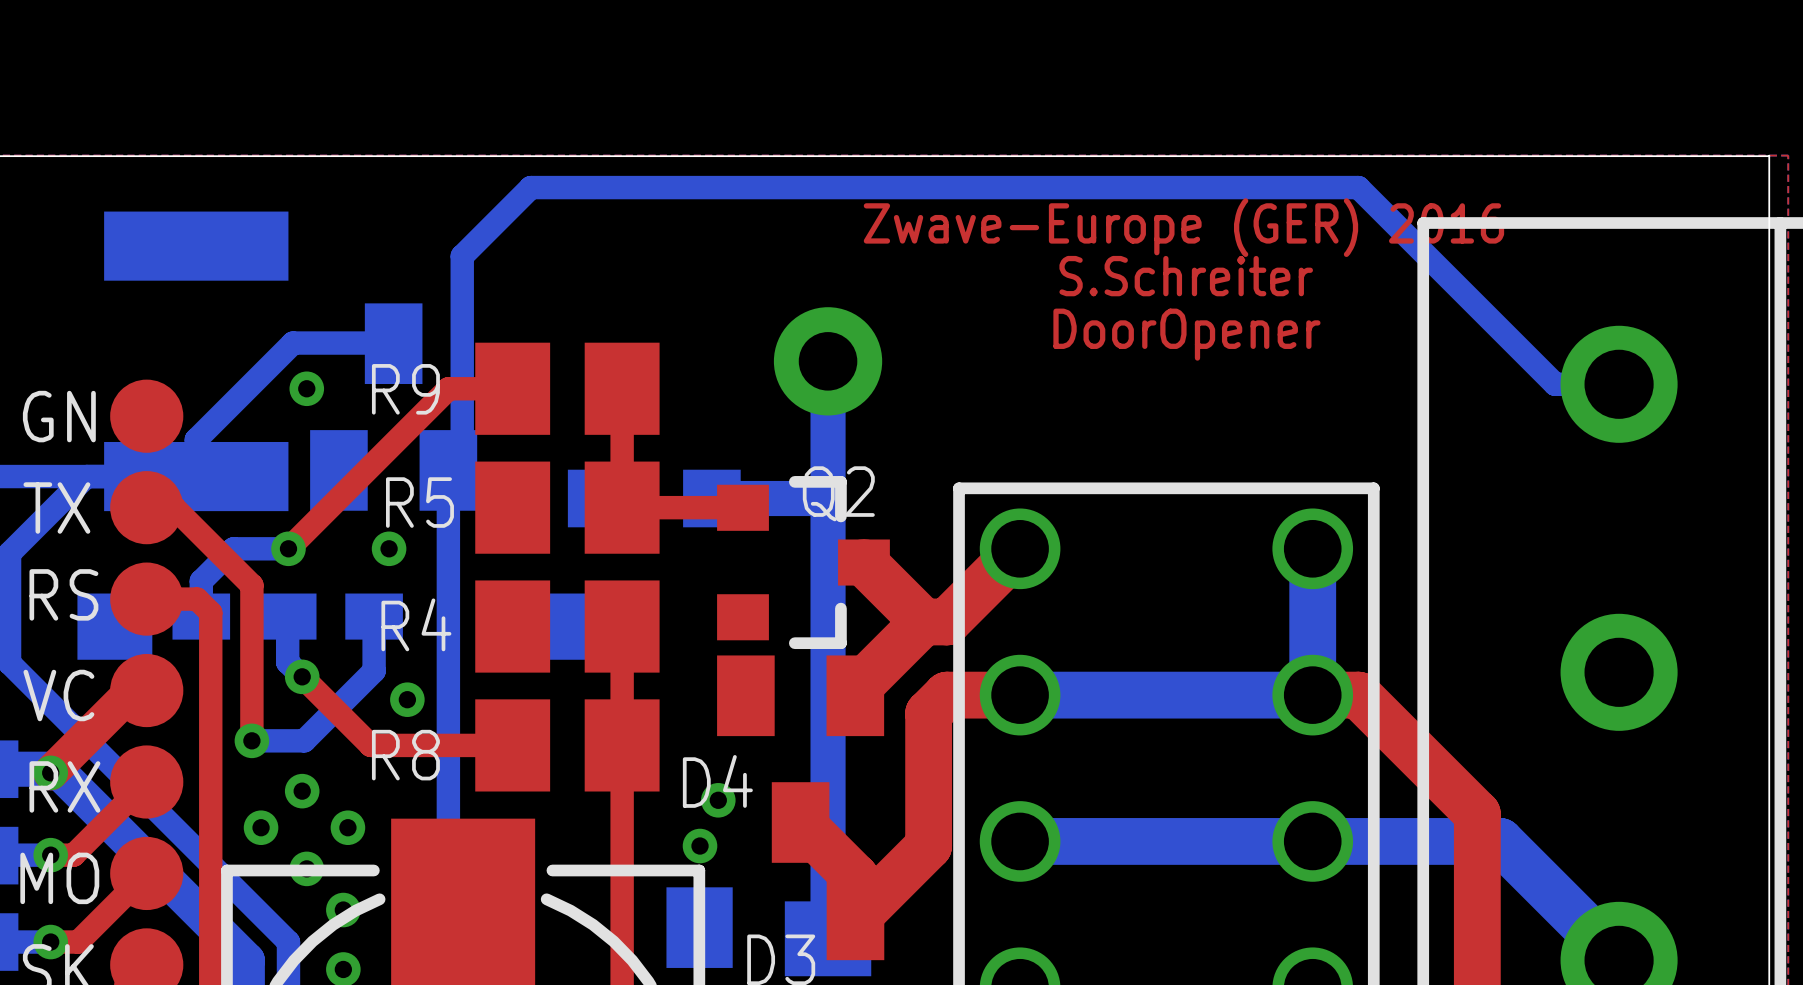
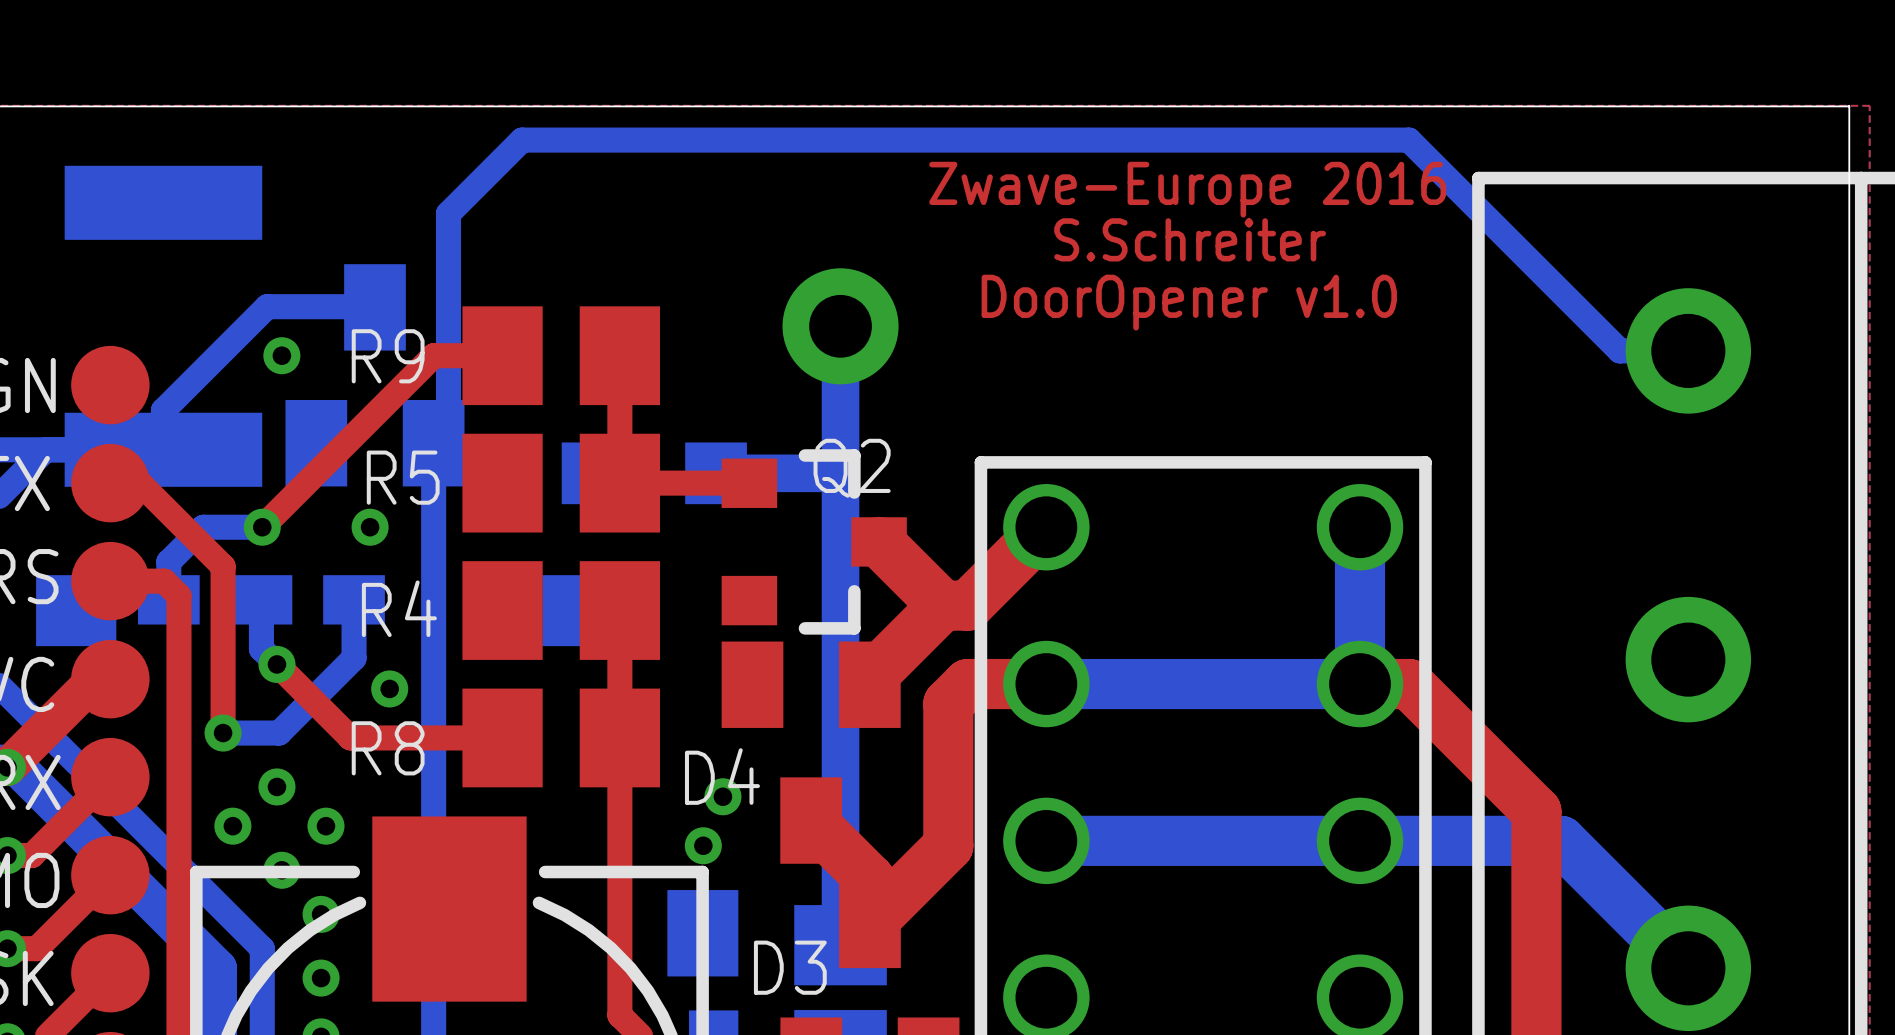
text: Zwave-Europe (GER) 2016 (1183, 227) -> Zwave-Europe 2016 (1187, 189)
text position: S.Schreiter (1186, 276) -> S.Schreiter (1190, 239)
text: DoorOpener (1186, 334) -> DoorOpener v1.0 (1189, 302)

